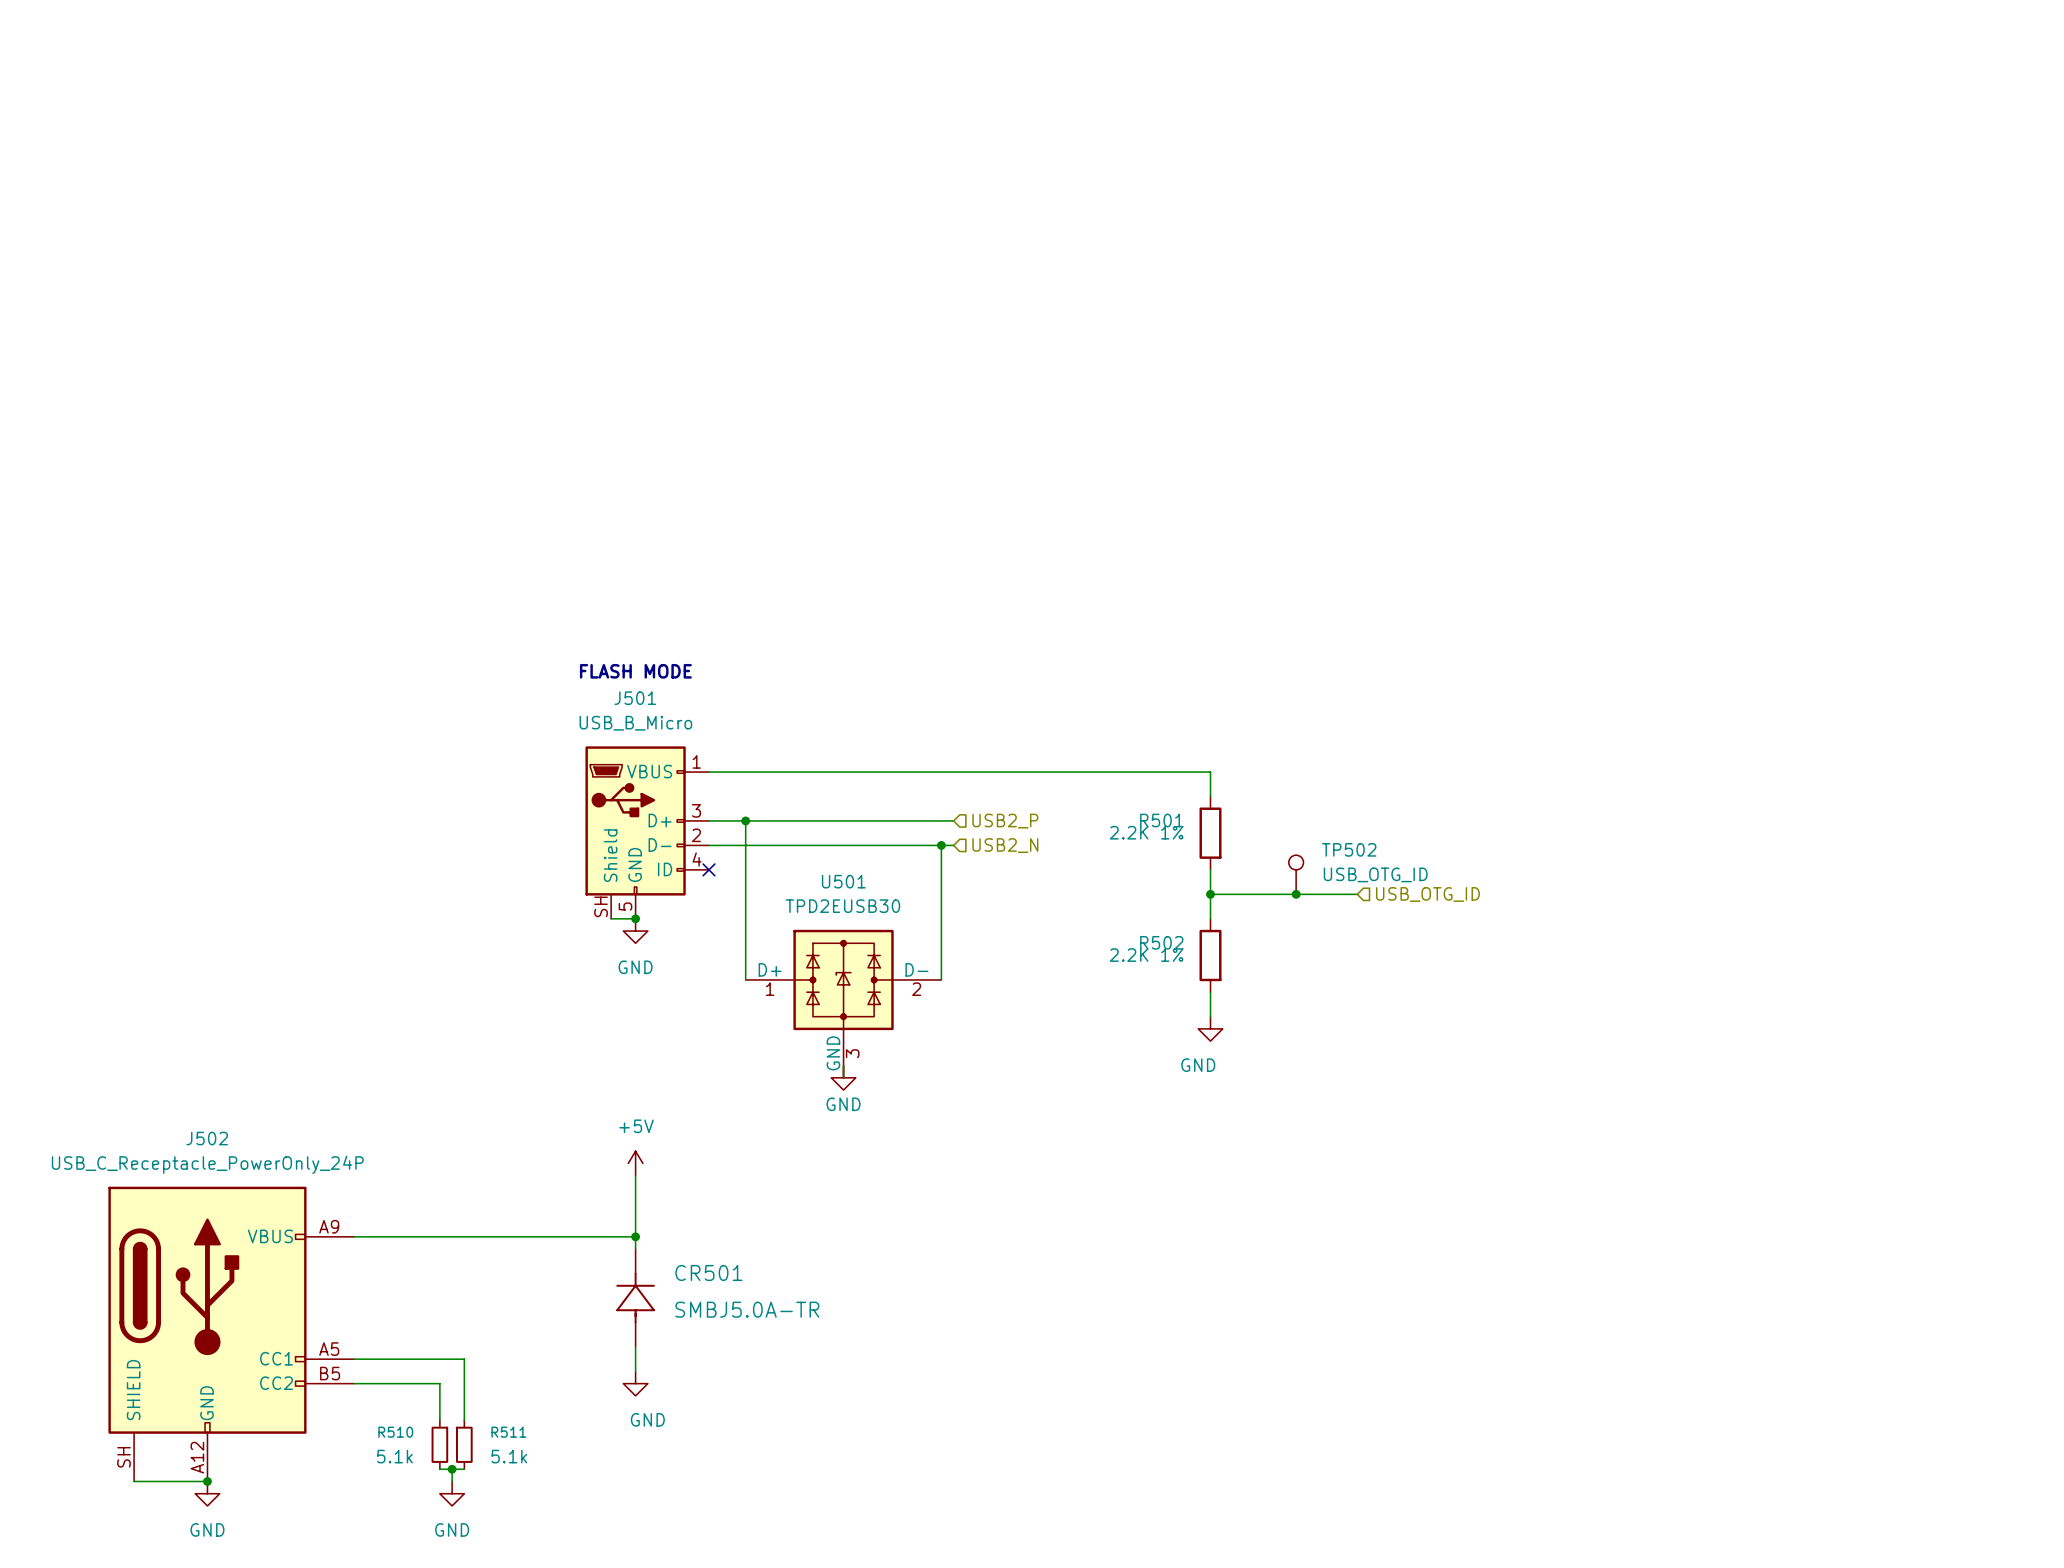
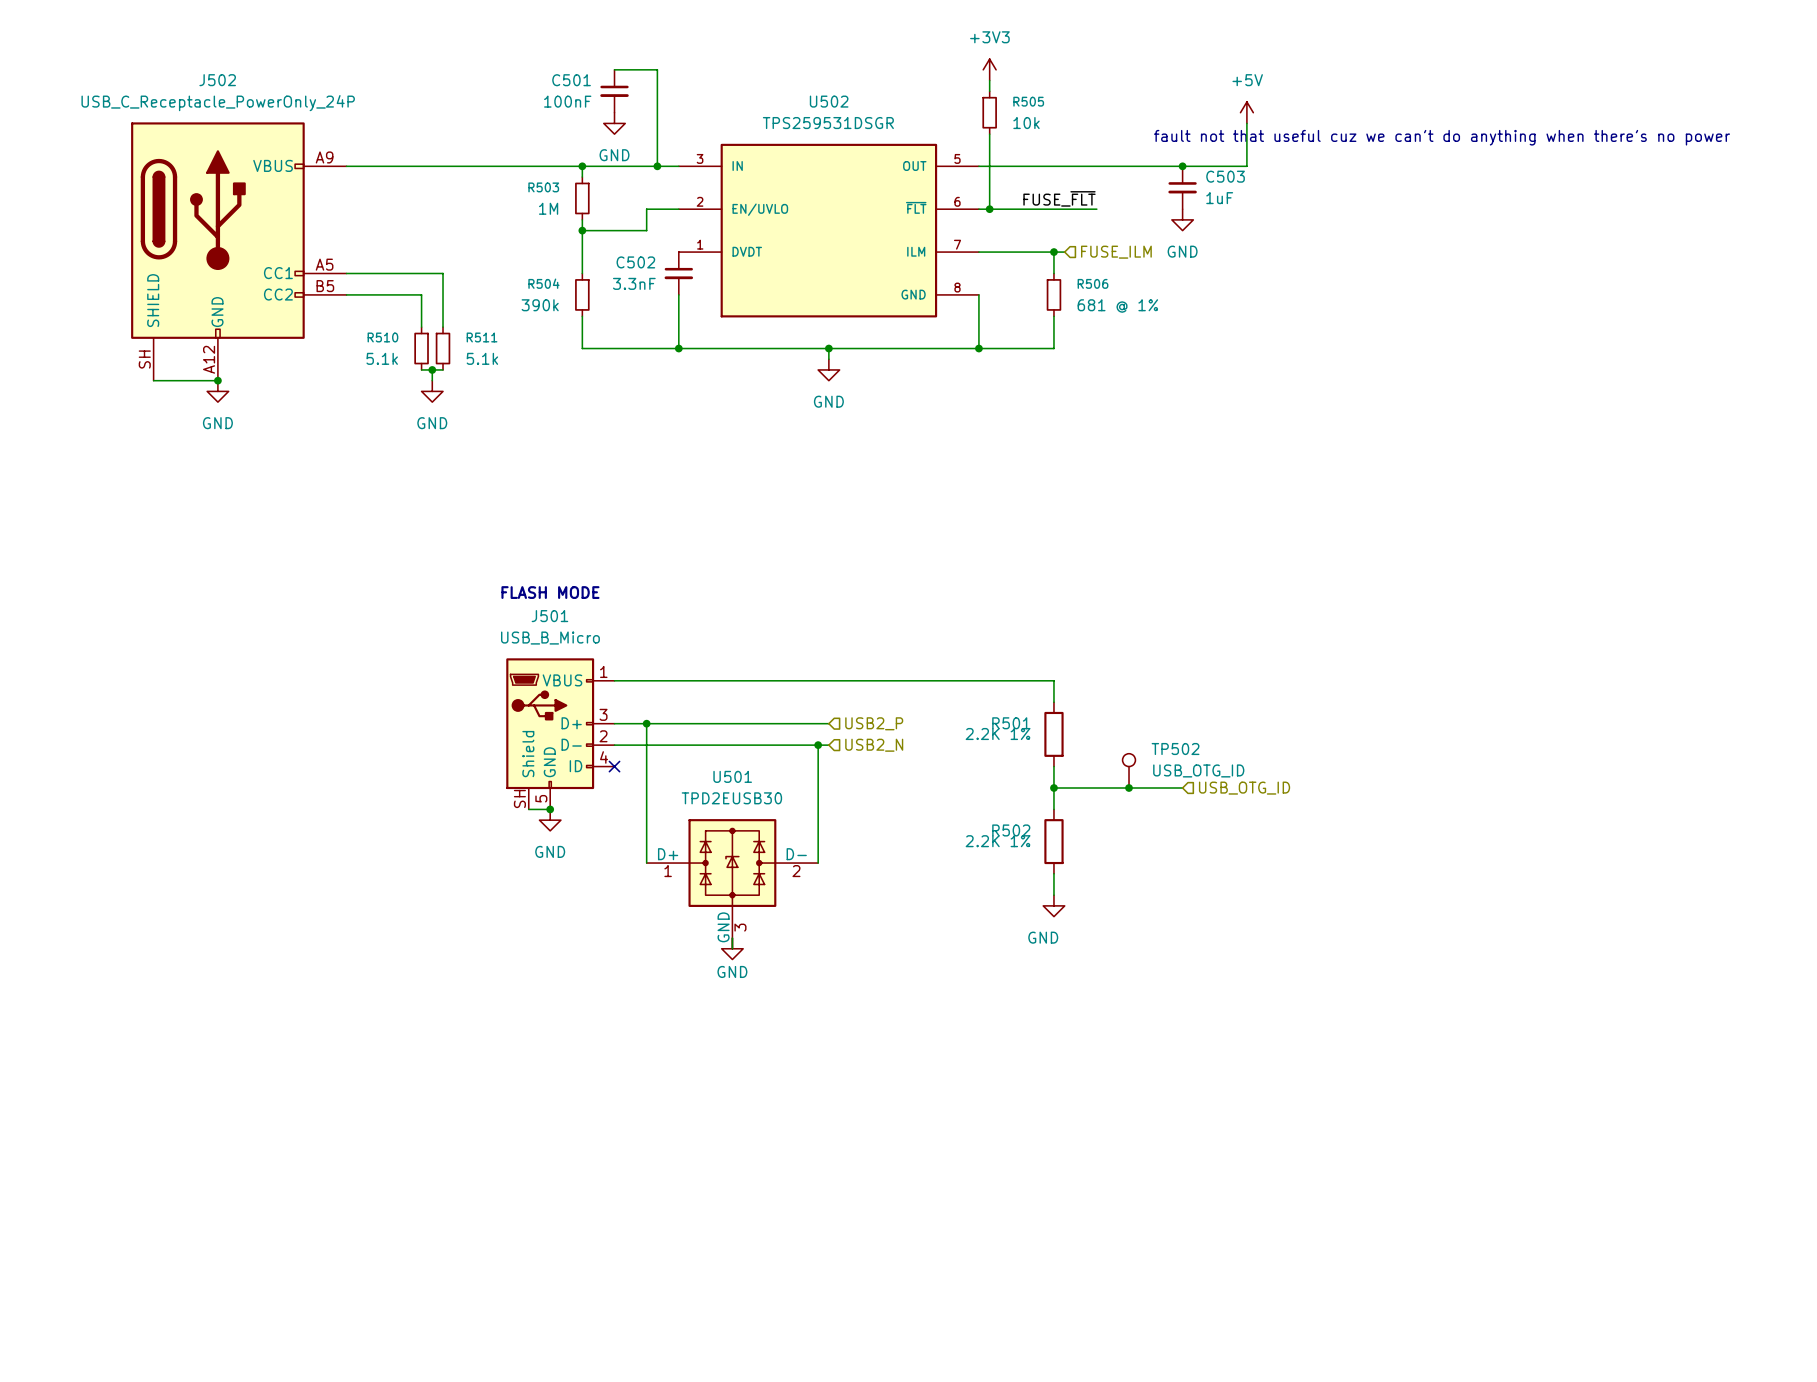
wire: none -> (614, 69) (657, 69) (657, 166)
power symbol: none -> +3V3 (989, 69)
wire: none -> (989, 80) (989, 91)
C501: none -> 100nF (614, 91)
R505: none -> 10k (989, 112)
power symbol: none -> +5V (1246, 112)
power symbol: none -> GND (614, 123)
wire: none -> (1246, 123) (1246, 166) (978, 166)
wire: none -> (989, 134) (989, 209)
text: none -> fault not that useful cuz we can't do anything when there's no power (1441, 137)
wire: none -> (346, 166) (678, 166)
wire: none -> (582, 166) (582, 177)
junction: none -> (582, 166)
junction: none -> (657, 166)
junction: none -> (1182, 166)
C503: none -> 1uF (1182, 187)
R503: none -> 1M (582, 198)
label: none -> FUSE_~{FLT} (1059, 198)
wire: none -> (678, 209) (646, 209) (646, 230) (582, 230)
wire: none -> (978, 209) (1096, 209)
junction: none -> (989, 209)
wire: none -> (582, 219) (582, 273)
power symbol: none -> GND (1182, 219)
junction: none -> (582, 230)
U502: none -> TPS259531DSGR (828, 230)
wire: none -> (978, 252) (1064, 252)
wire: none -> (1053, 252) (1053, 273)
junction: none -> (1053, 252)
hierarchical label: none -> FUSE_ILM (1116, 252)
wire: none -> (346, 273) (443, 273) (443, 327)
C502: none -> 3.3nF (678, 273)
wire: none -> (346, 294) (421, 294) (421, 327)
R504: none -> 390k (582, 294)
wire: none -> (678, 294) (678, 348)
wire: none -> (978, 294) (978, 348)
R506: none -> 681 @ 1% (1053, 294)
wire: none -> (582, 316) (582, 348) (1053, 348) (1053, 316)
junction: none -> (678, 348)
wire: none -> (828, 348) (828, 359)
junction: none -> (828, 348)
junction: none -> (978, 348)
wire: none -> (421, 369) (443, 369)
wire: none -> (432, 369) (432, 380)
junction: none -> (432, 369)
power symbol: none -> GND (828, 369)
wire: none -> (153, 380) (217, 380)
junction: none -> (217, 380)
power symbol: none -> GND (217, 391)
power symbol: none -> GND (432, 391)
power symbol: +5V (635, 1163) -> none
wire: (635, 1175) (635, 1249) -> none
wire: (354, 1236) (635, 1236) -> none
junction: (635, 1236) -> none
CR501: SMBJ5.0A-TR (635, 1298) -> none
J502 position: (231, 1334) -> (238, 251)
wire: (635, 1346) (635, 1371) -> none
wire: (354, 1359) (464, 1359) (464, 1420) -> none
wire: (354, 1383) (439, 1383) (439, 1420) -> none
power symbol: GND (635, 1383) -> none
R510 position: (439, 1444) -> (421, 348)
R511 position: (464, 1444) -> (443, 348)
wire: (439, 1469) (464, 1469) -> none
wire: (452, 1469) (452, 1481) -> none
junction: (452, 1469) -> none
wire: (134, 1481) (207, 1481) -> none
junction: (207, 1481) -> none
power symbol: GND (207, 1493) -> none
power symbol: GND (452, 1493) -> none

